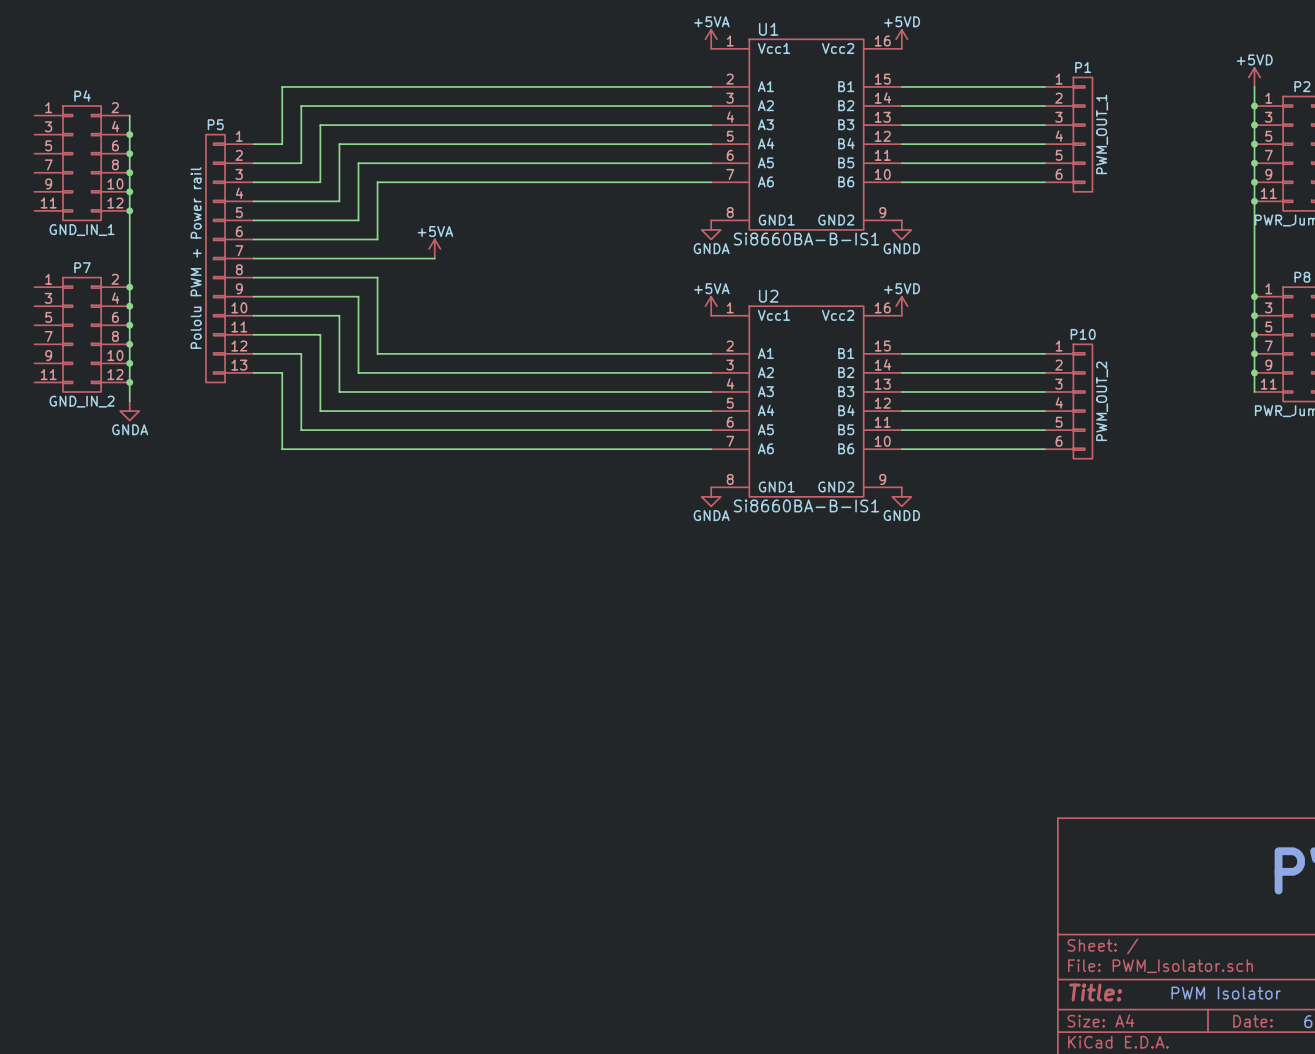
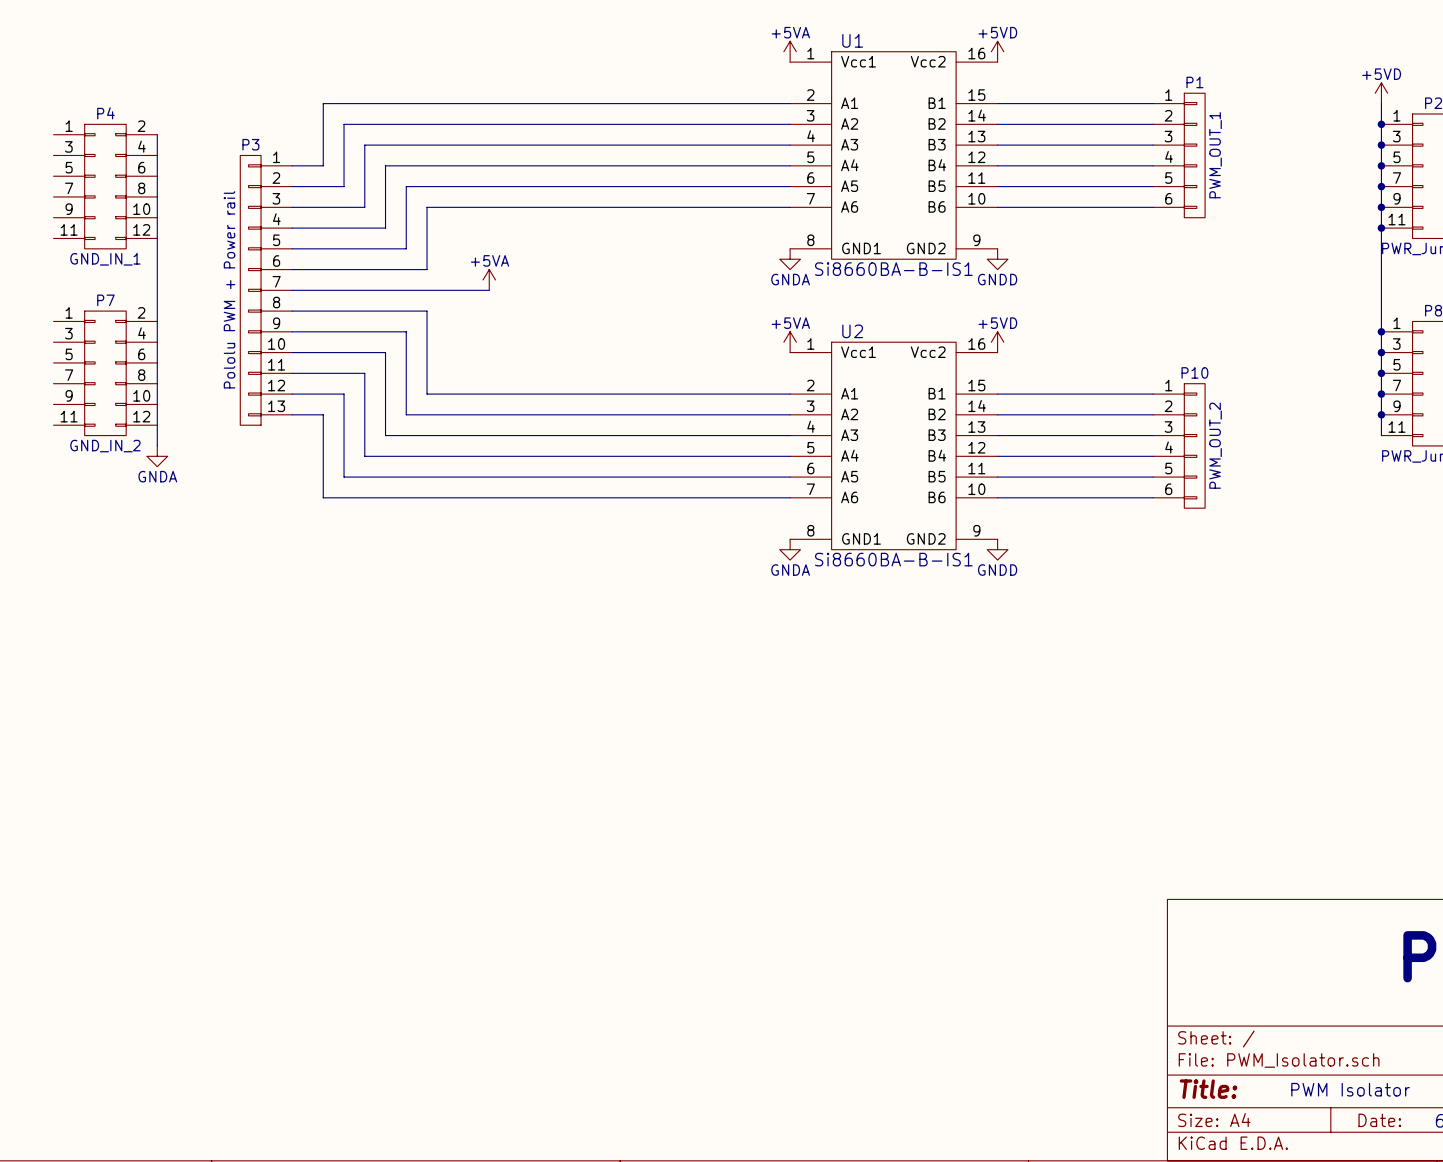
P5 name: P5 (215, 124) -> P3 (250, 144)
junction: (129, 134) -> none
junction: (129, 153) -> none
junction: (129, 172) -> none
junction: (129, 191) -> none
junction: (129, 210) -> none
junction: (129, 287) -> none
junction: (129, 306) -> none
junction: (129, 325) -> none
junction: (129, 344) -> none
junction: (129, 363) -> none
junction: (129, 382) -> none

